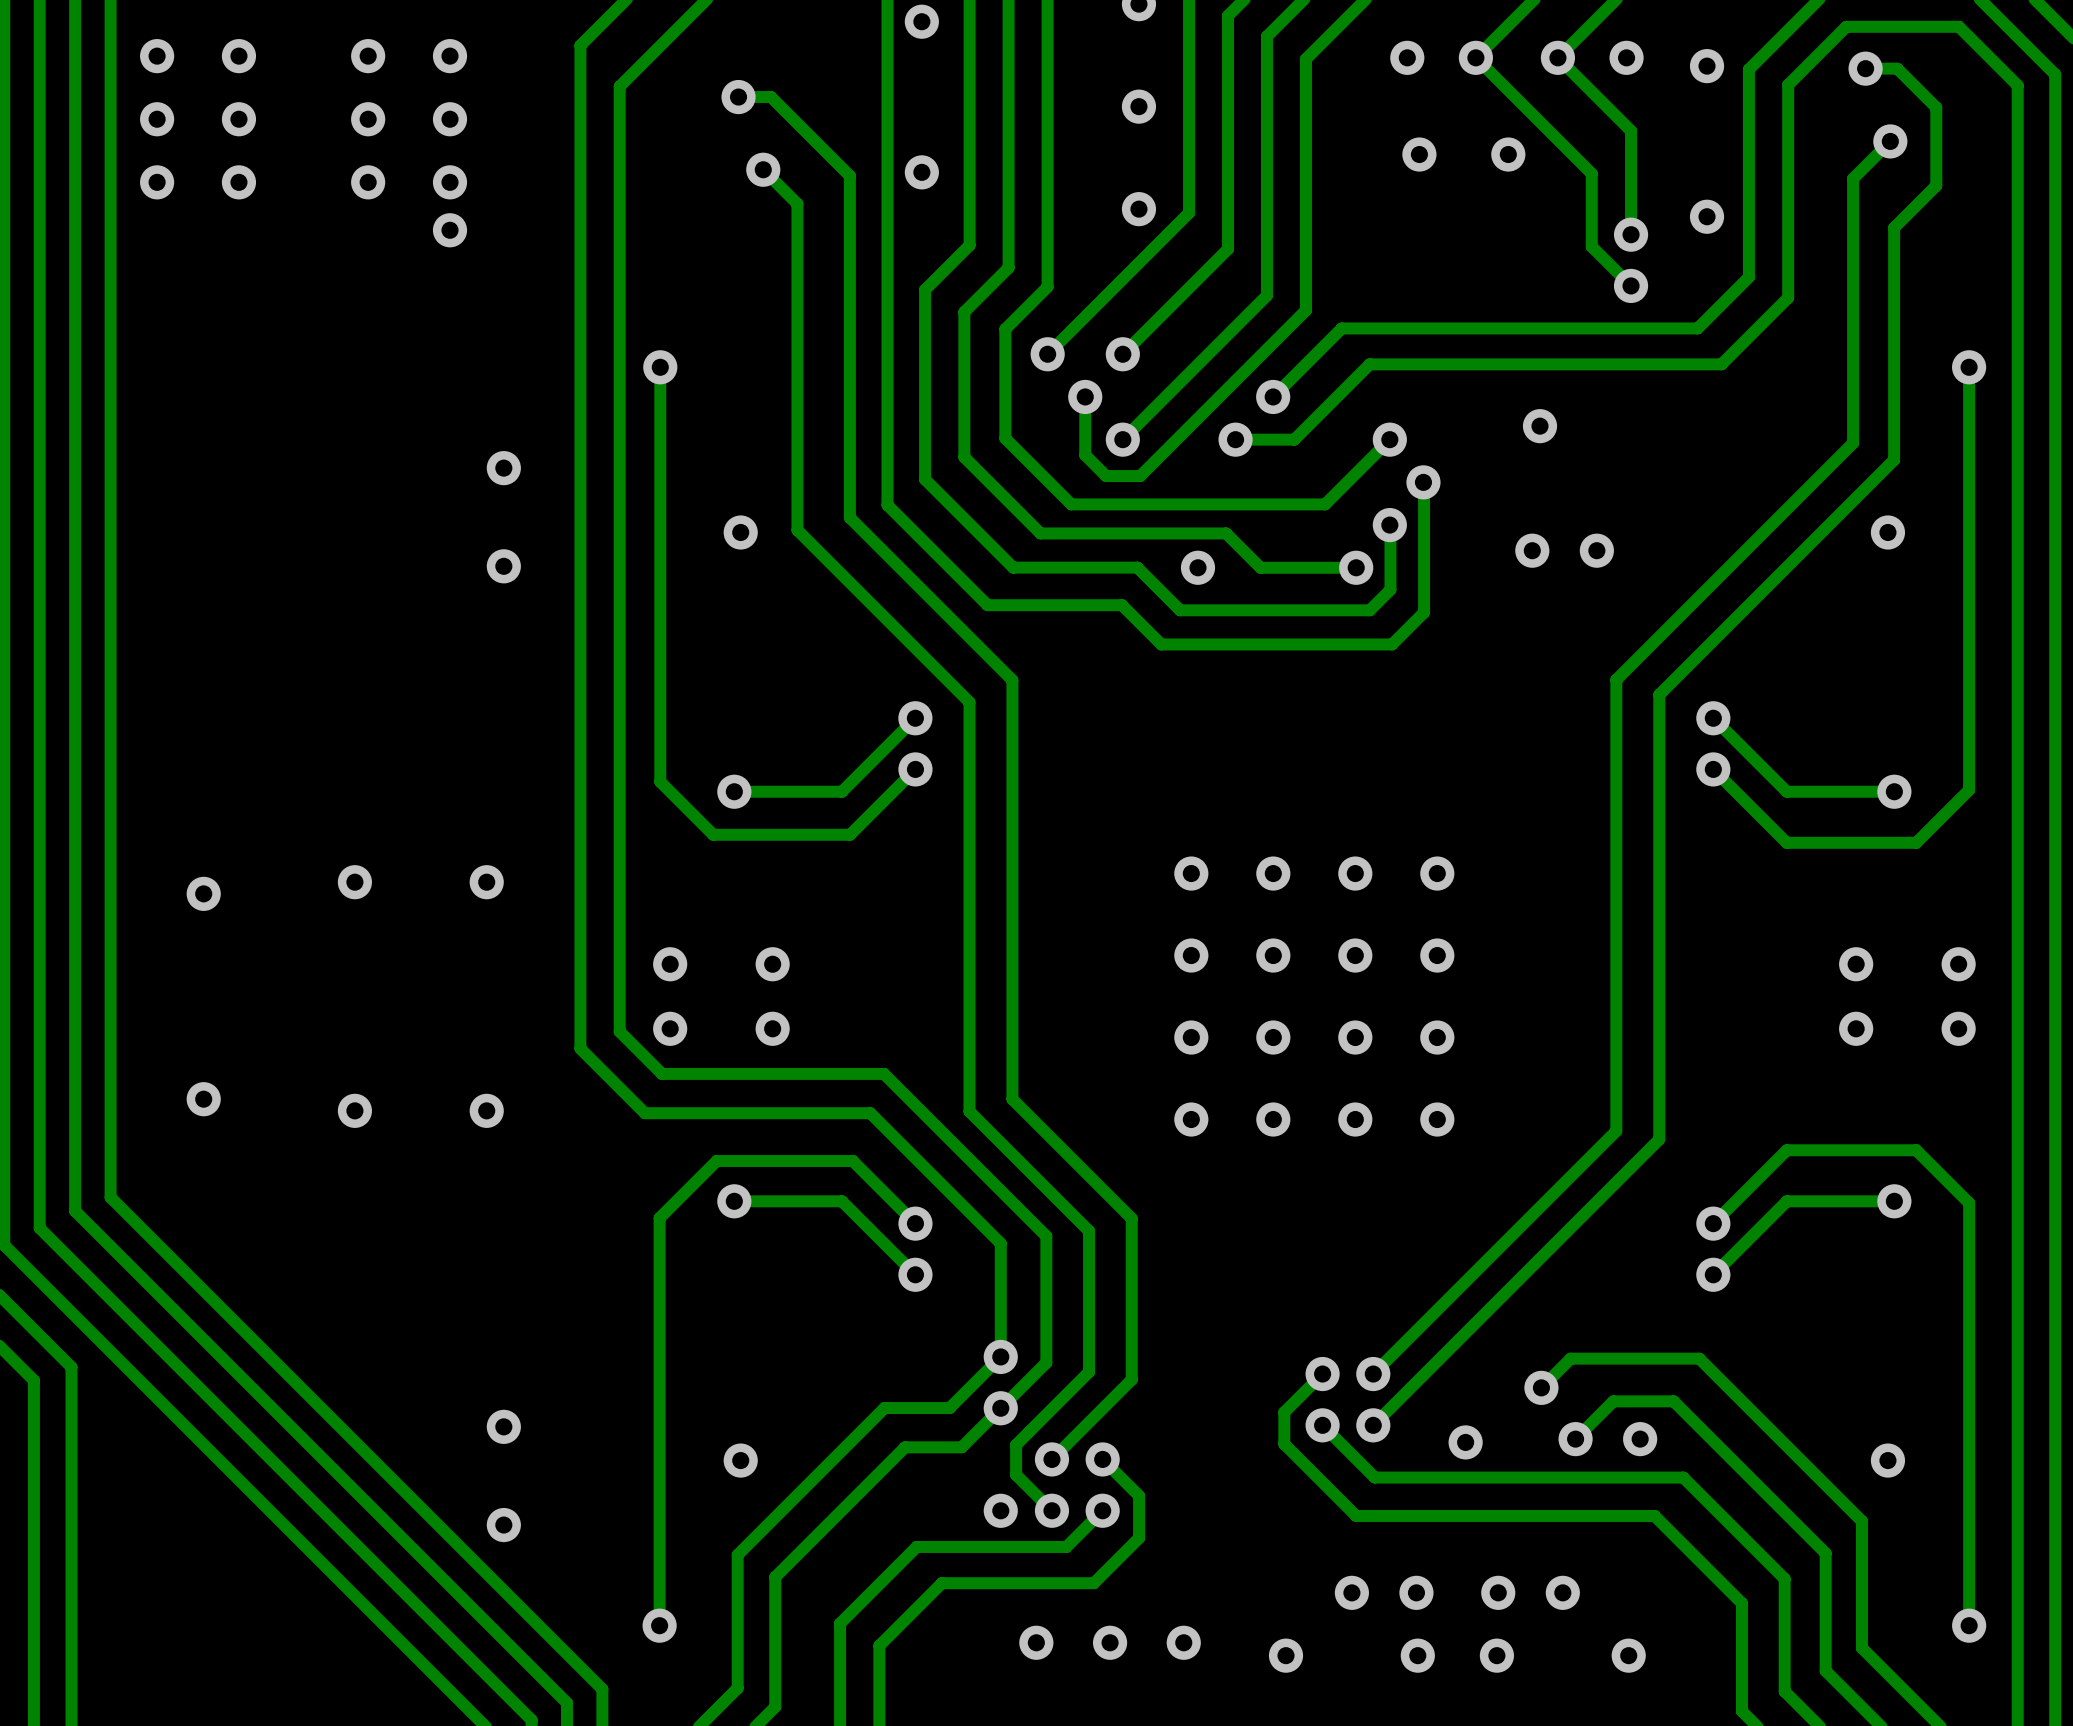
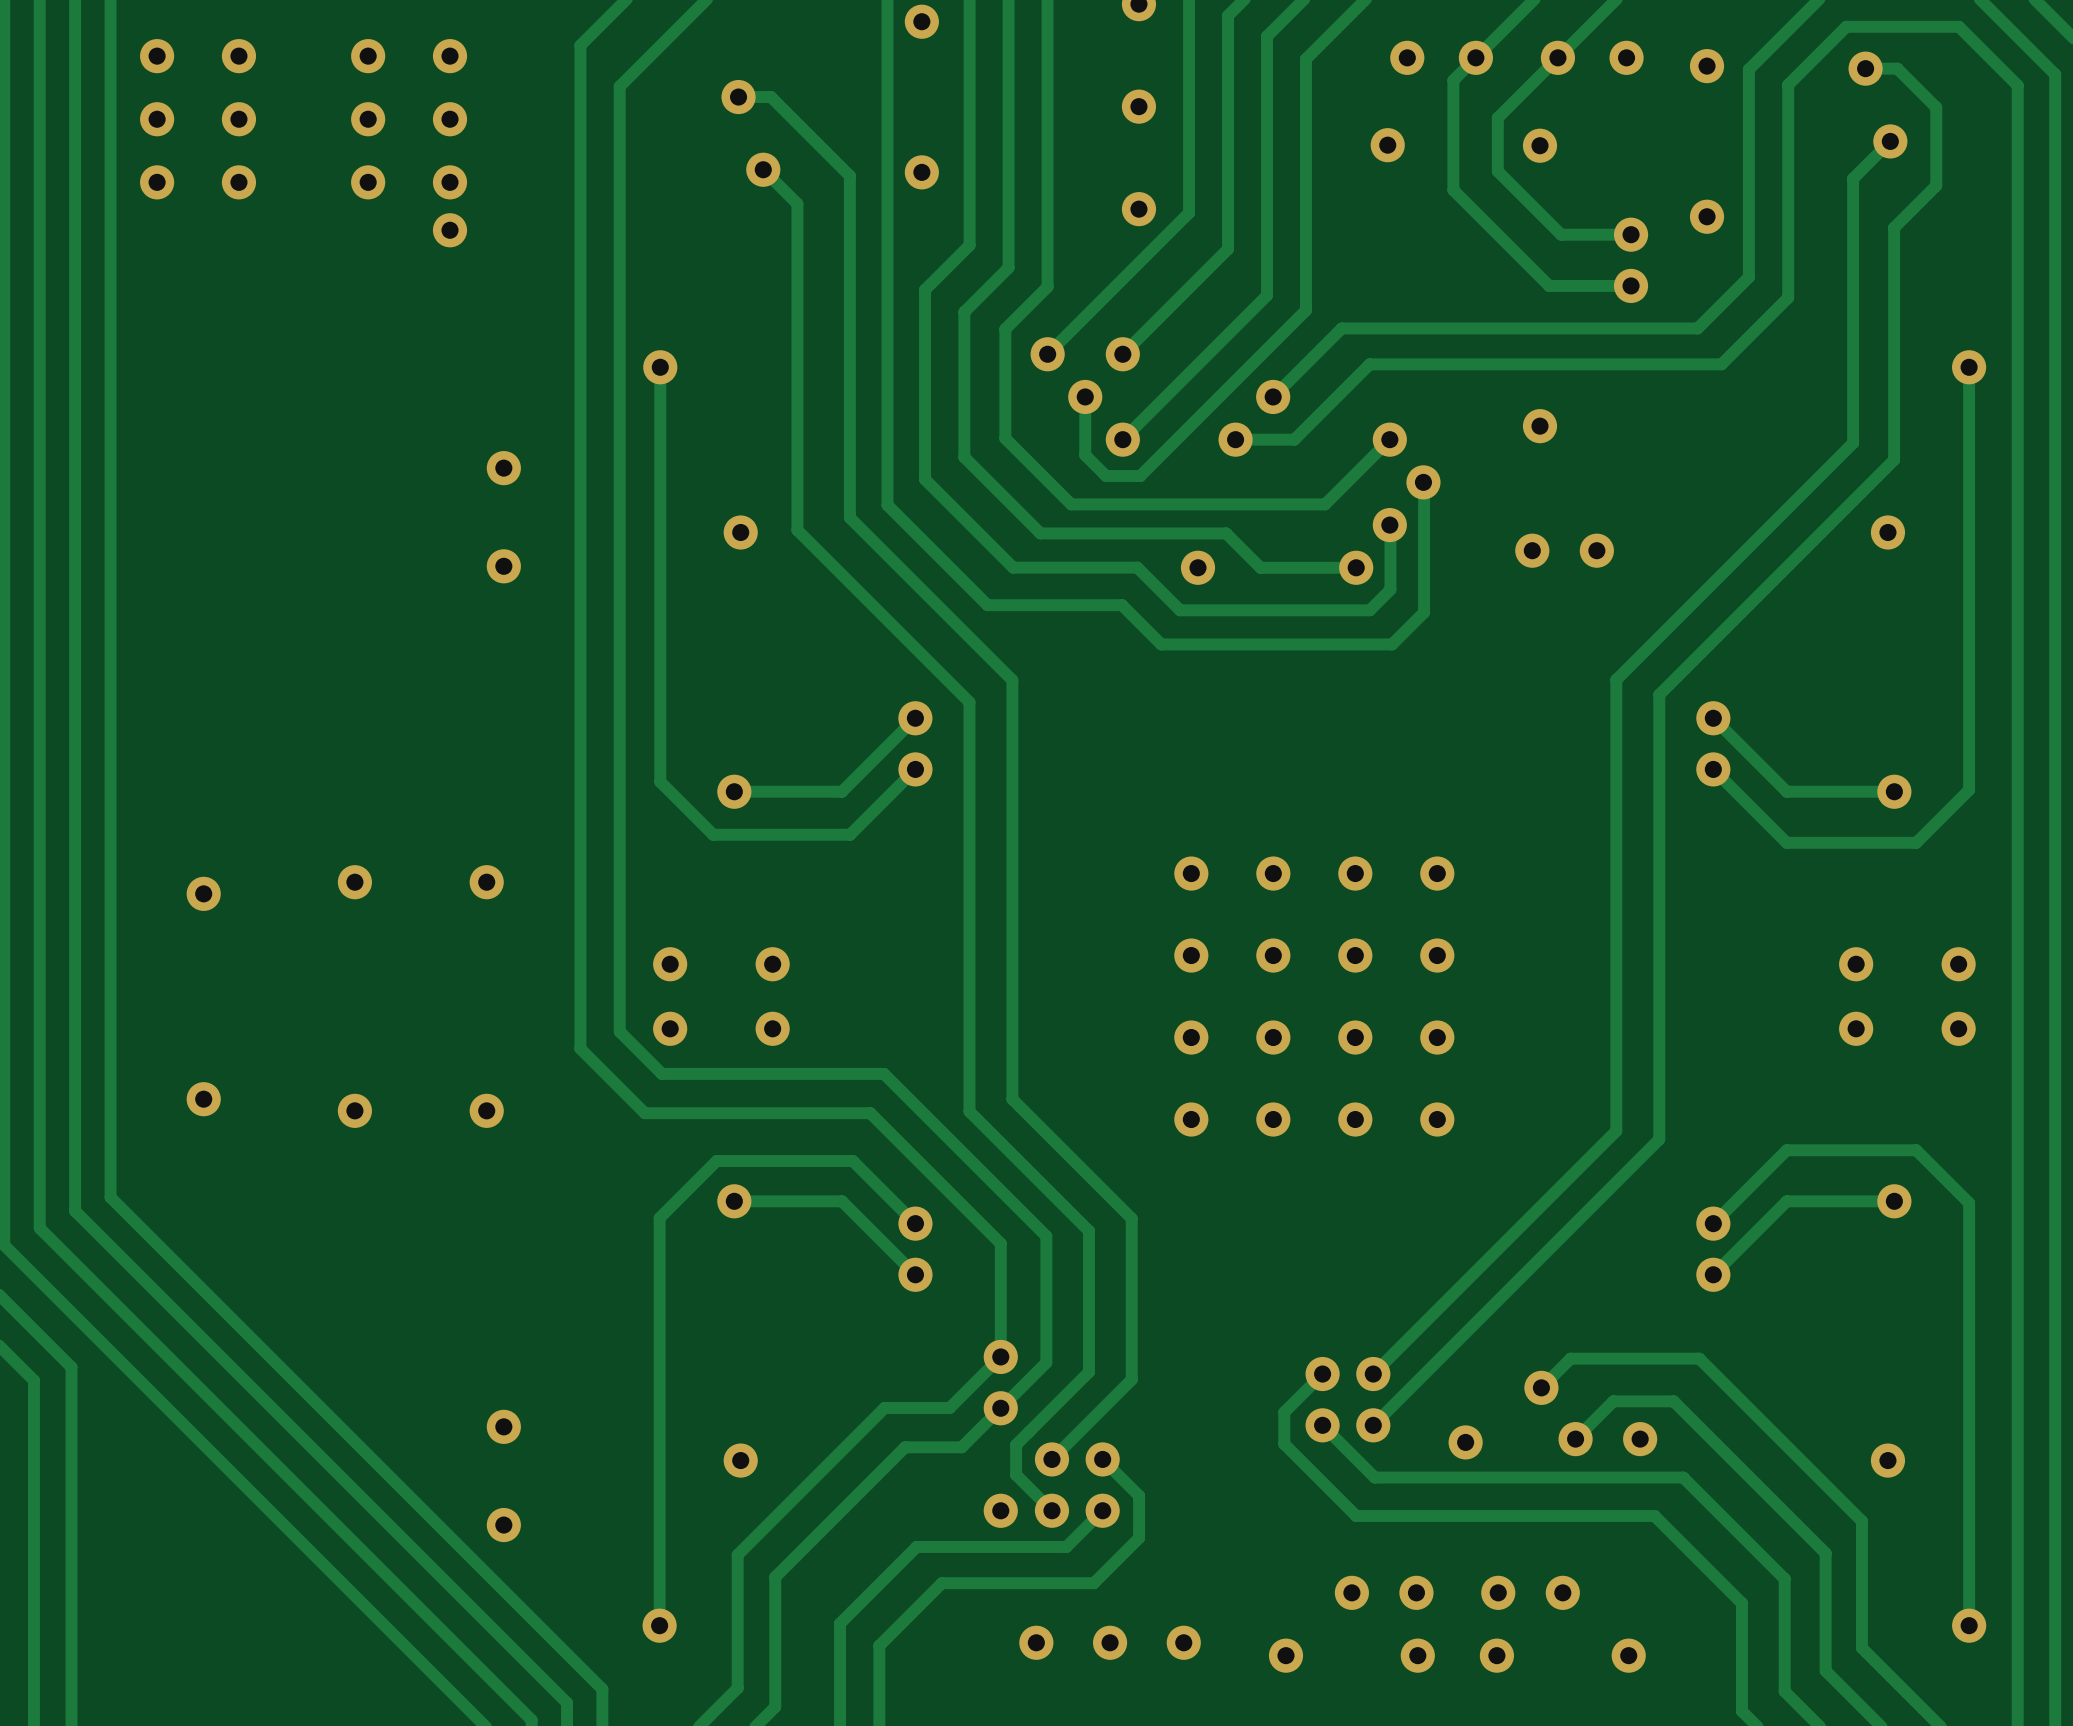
track: (1475, 57) (1591, 173) (1591, 246) (1631, 285) -> (1475, 57) (1453, 80) (1453, 190) (1549, 285) (1631, 285)
track: (1557, 57) (1631, 130) (1631, 234) -> (1557, 57) (1497, 117) (1497, 171) (1561, 234) (1631, 234)
via position: (1419, 154) -> (1387, 145)
via position: (1508, 154) -> (1540, 145)

